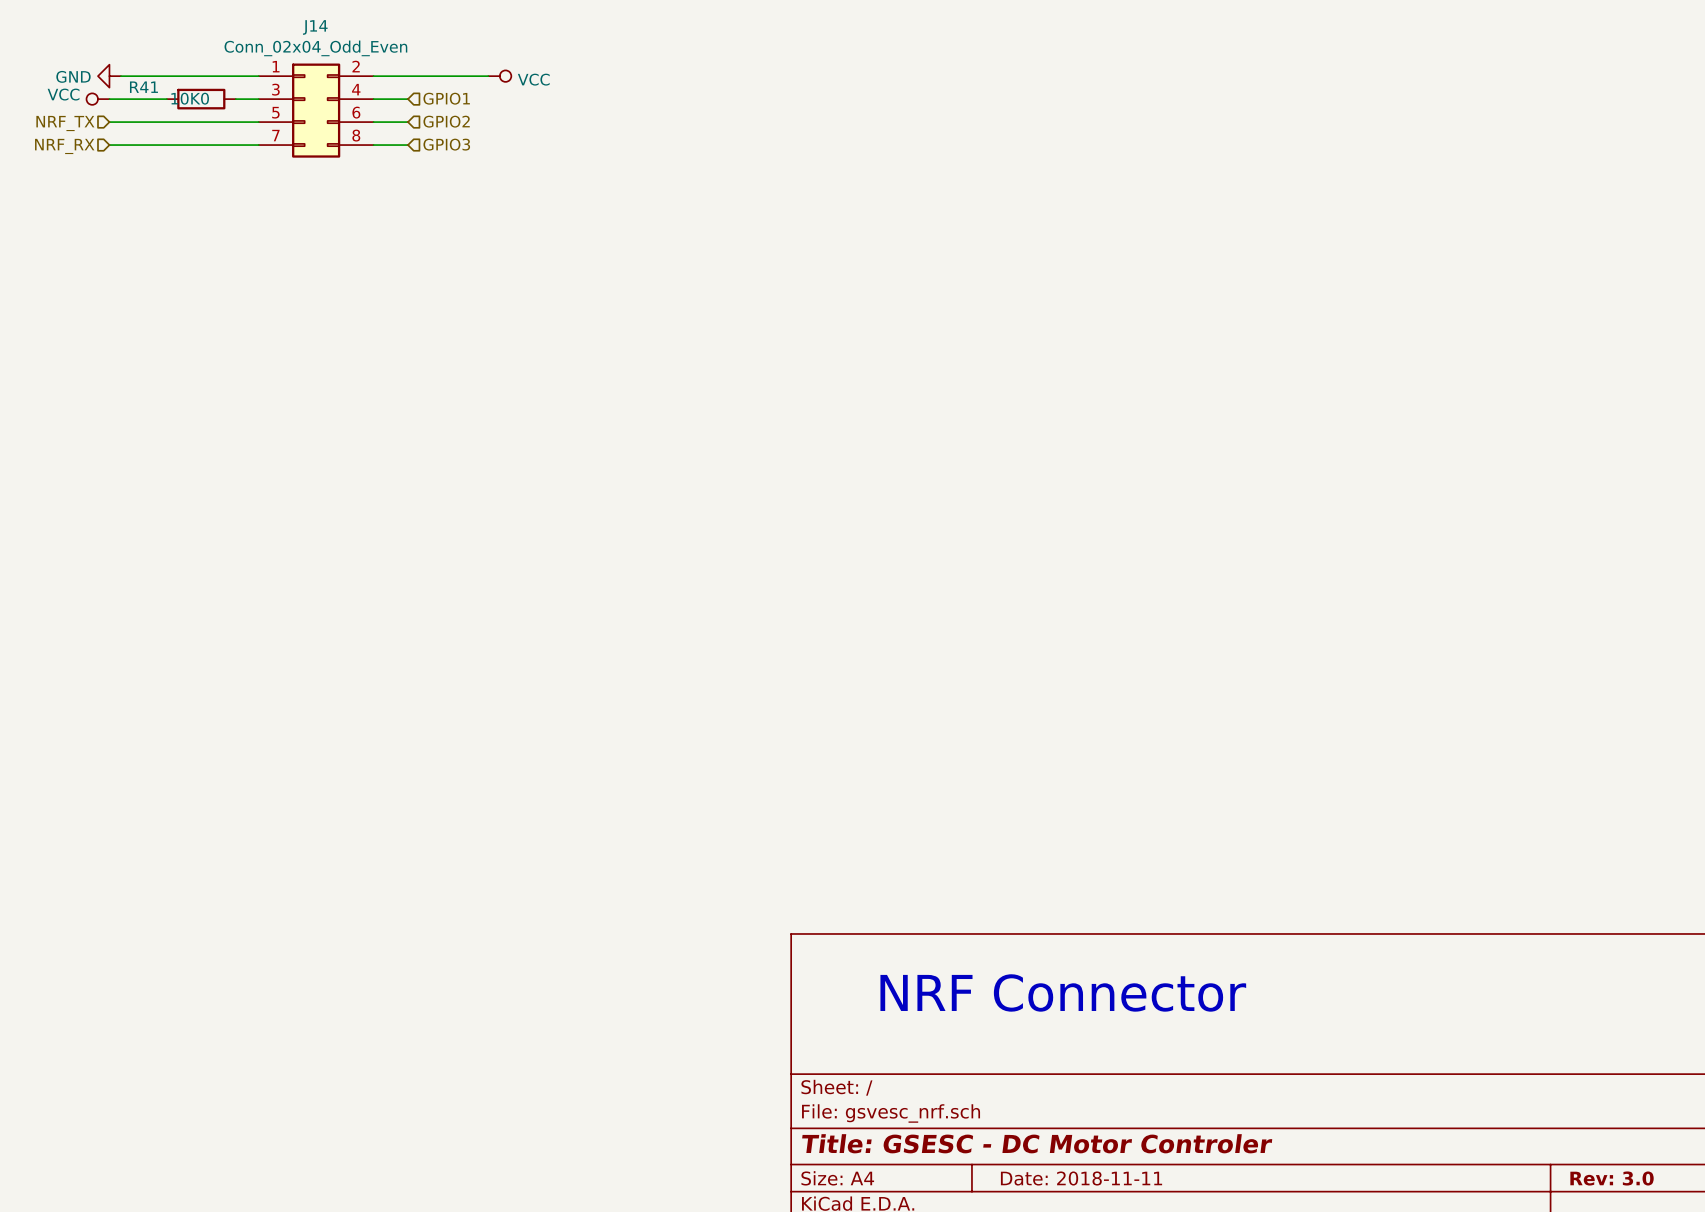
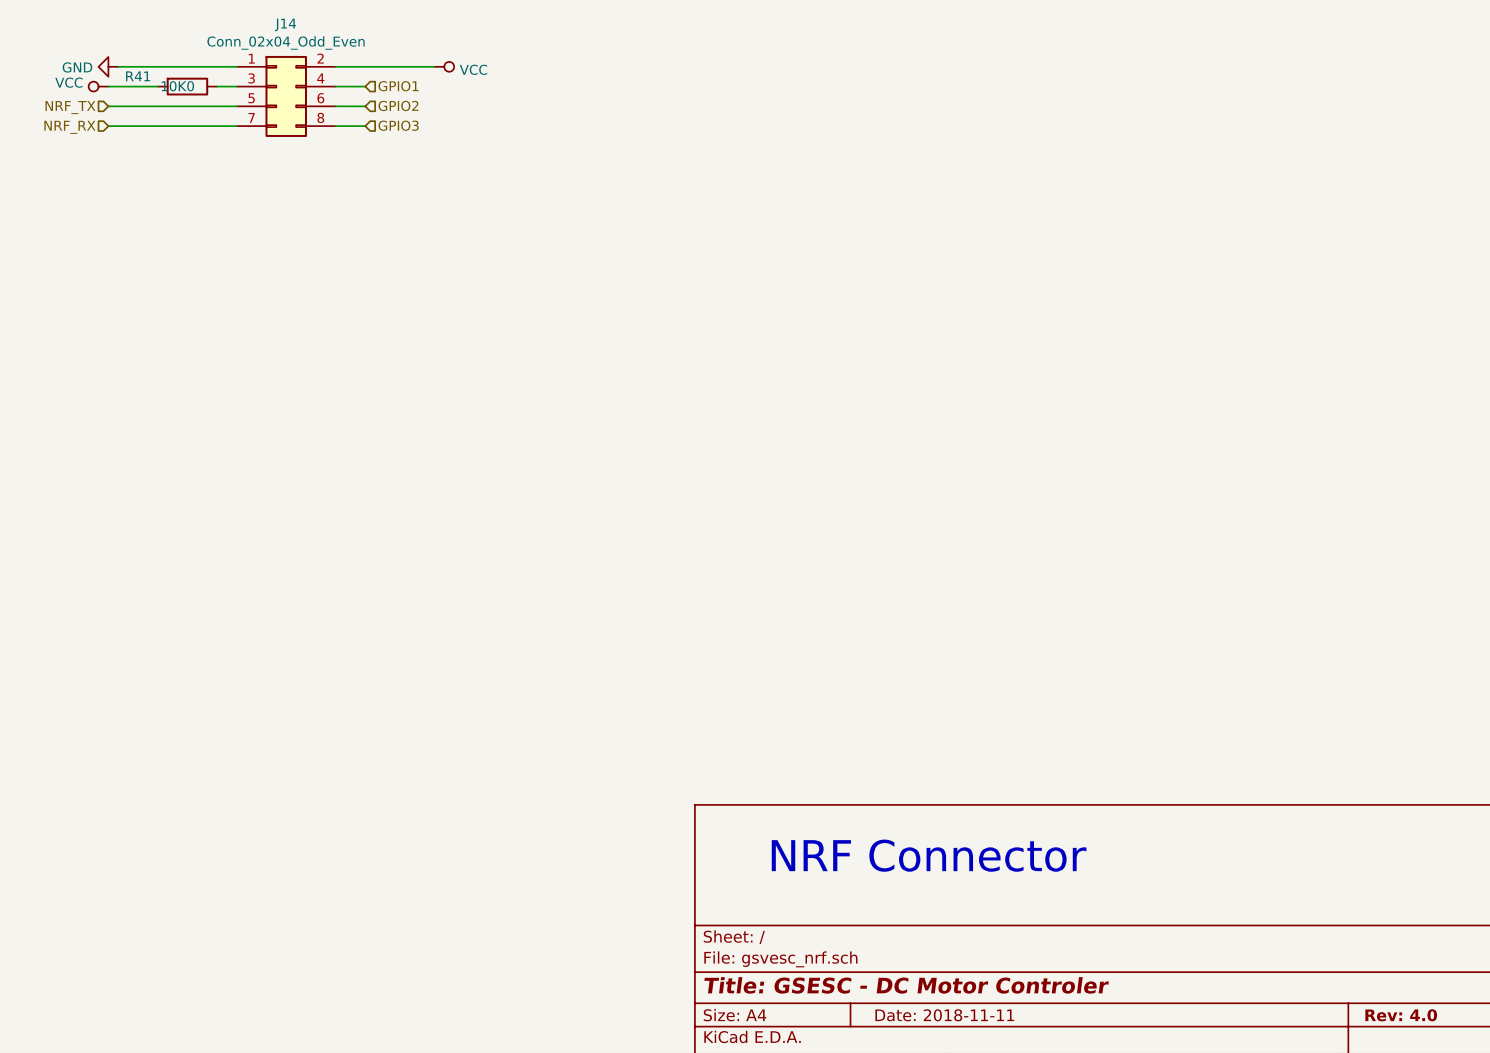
title block: Rev: 3.0 (1612, 1178) -> Rev: 4.0 (1401, 1015)

